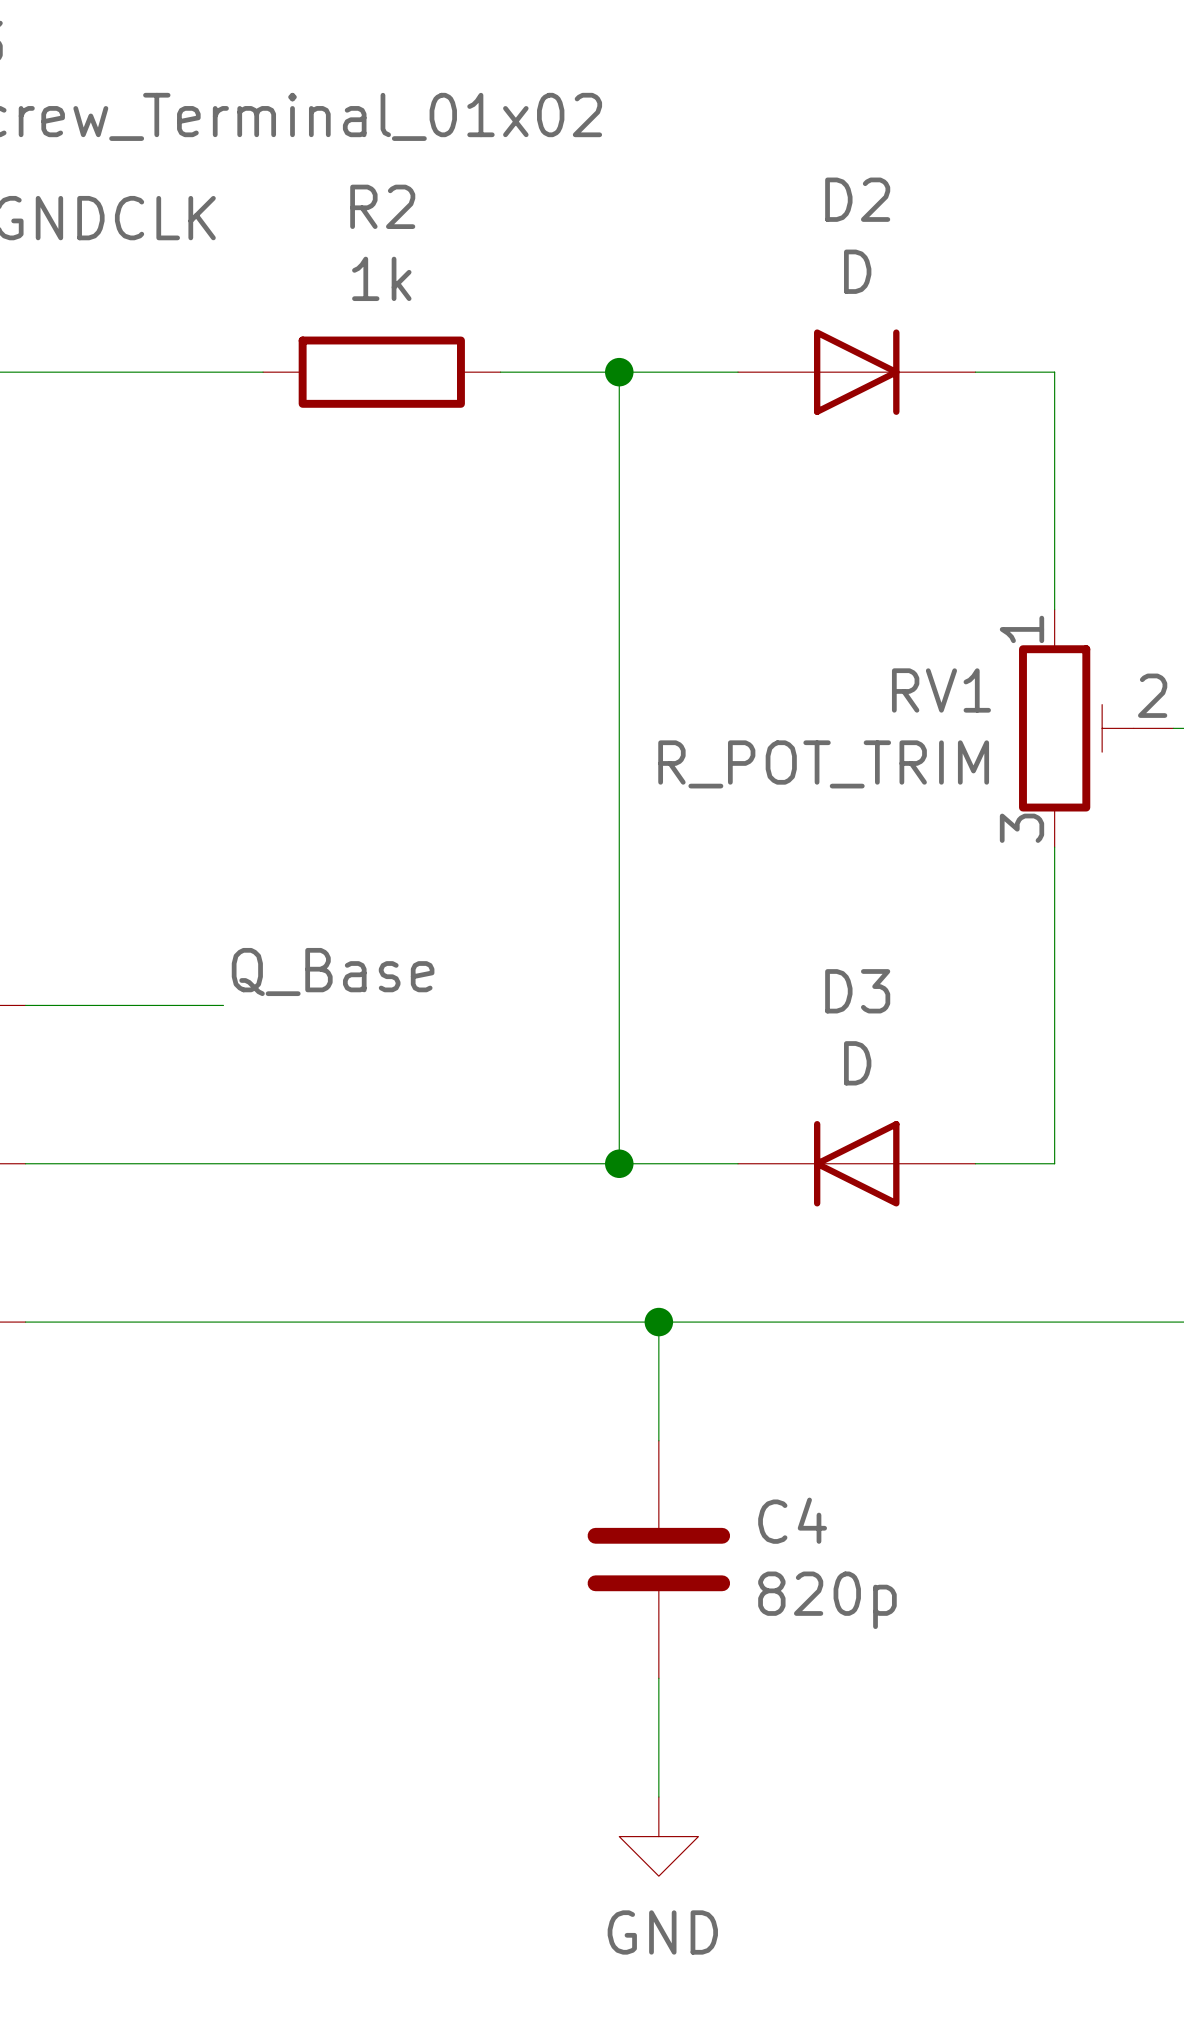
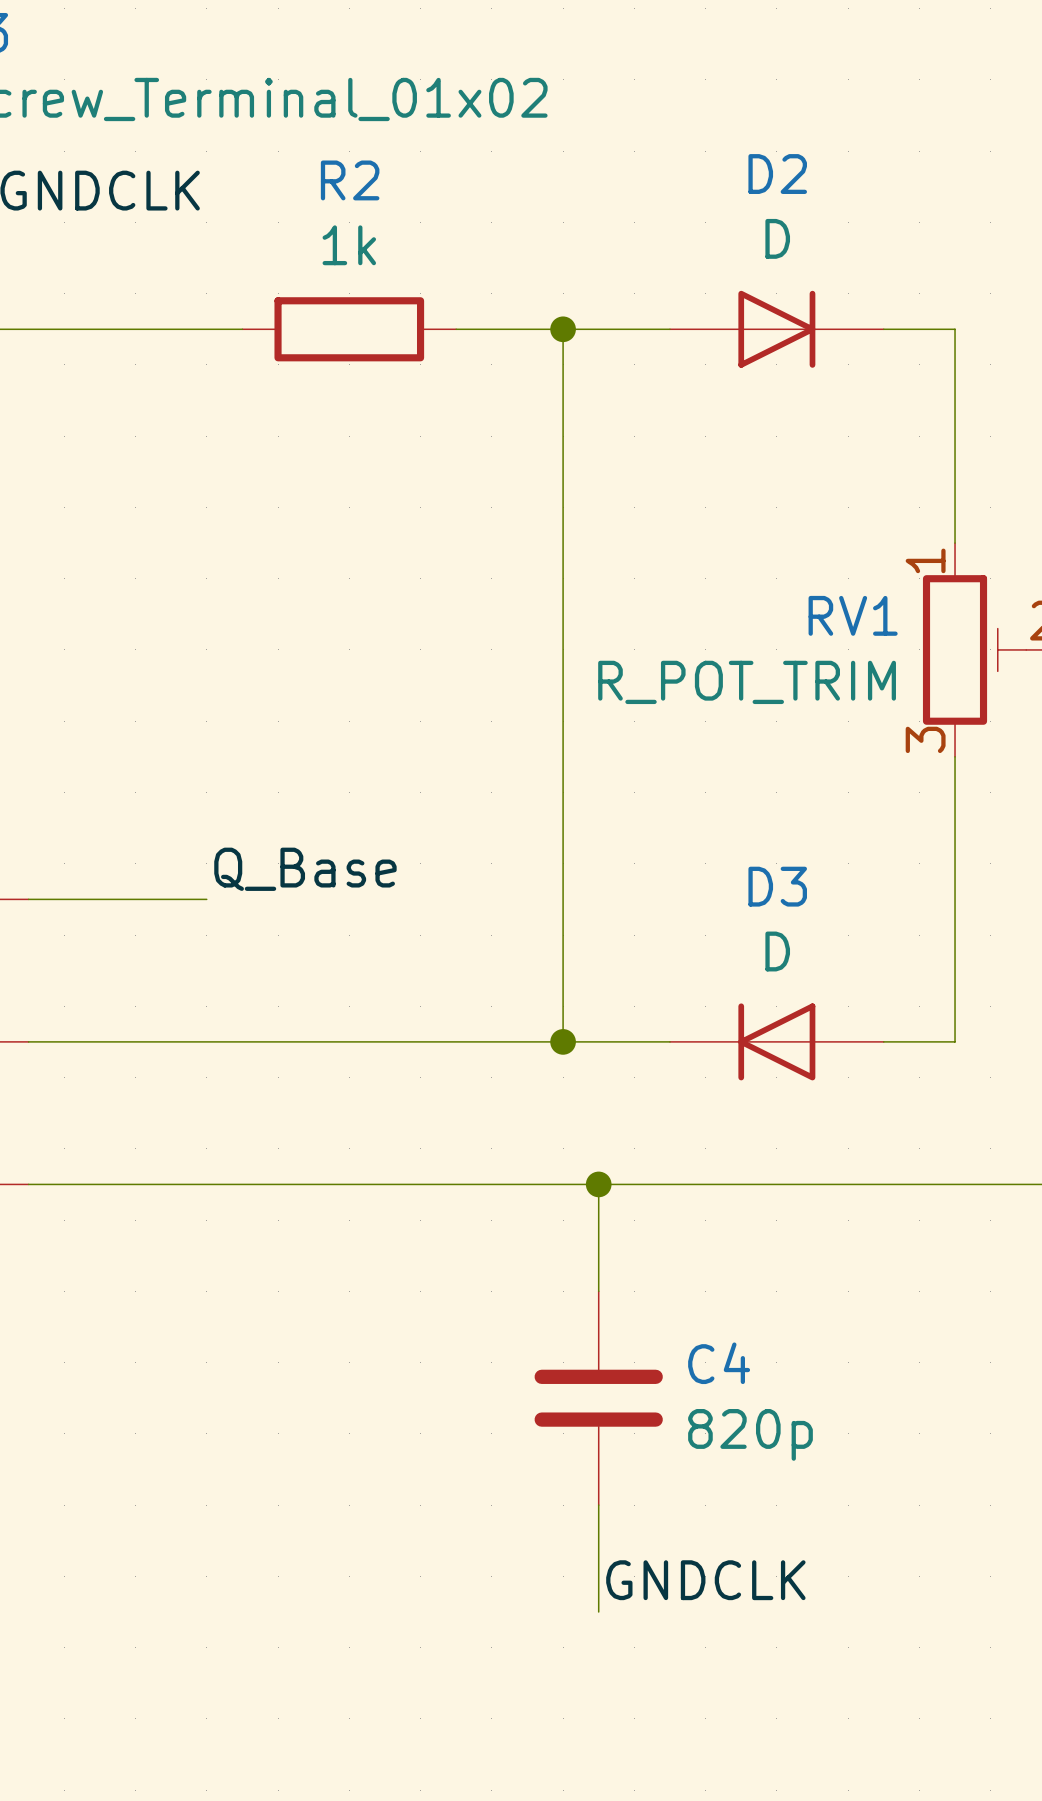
label: none -> GNDCLK (705, 1580)
power symbol: GND (658, 1836) -> none

